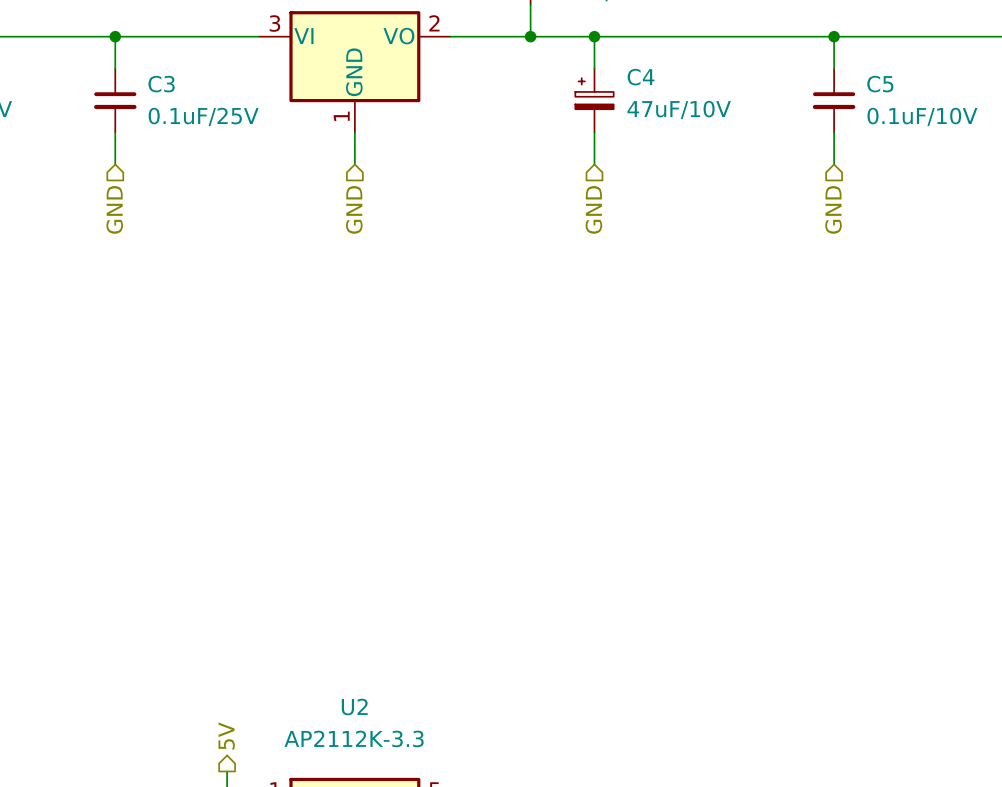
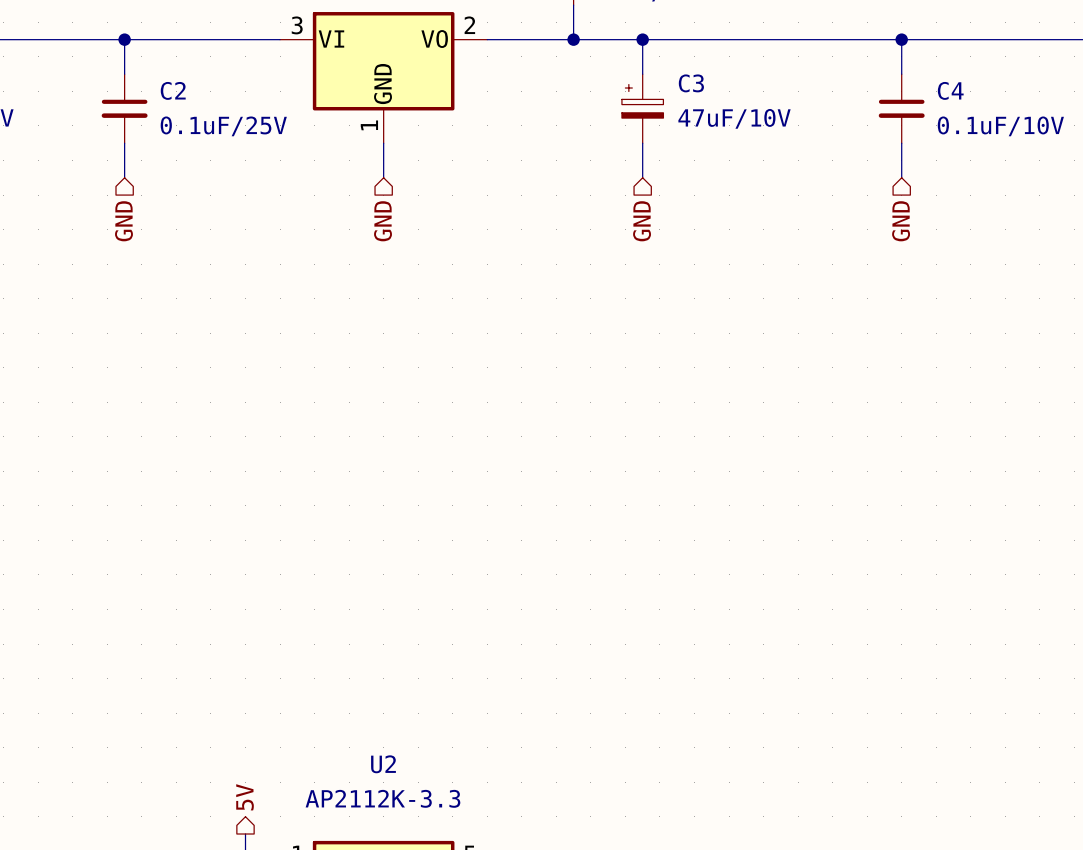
C4 name: C4 (641, 77) -> C3 (691, 83)
C3 name: C3 (161, 84) -> C2 (173, 90)
C5 name: C5 (880, 84) -> C4 (950, 90)

